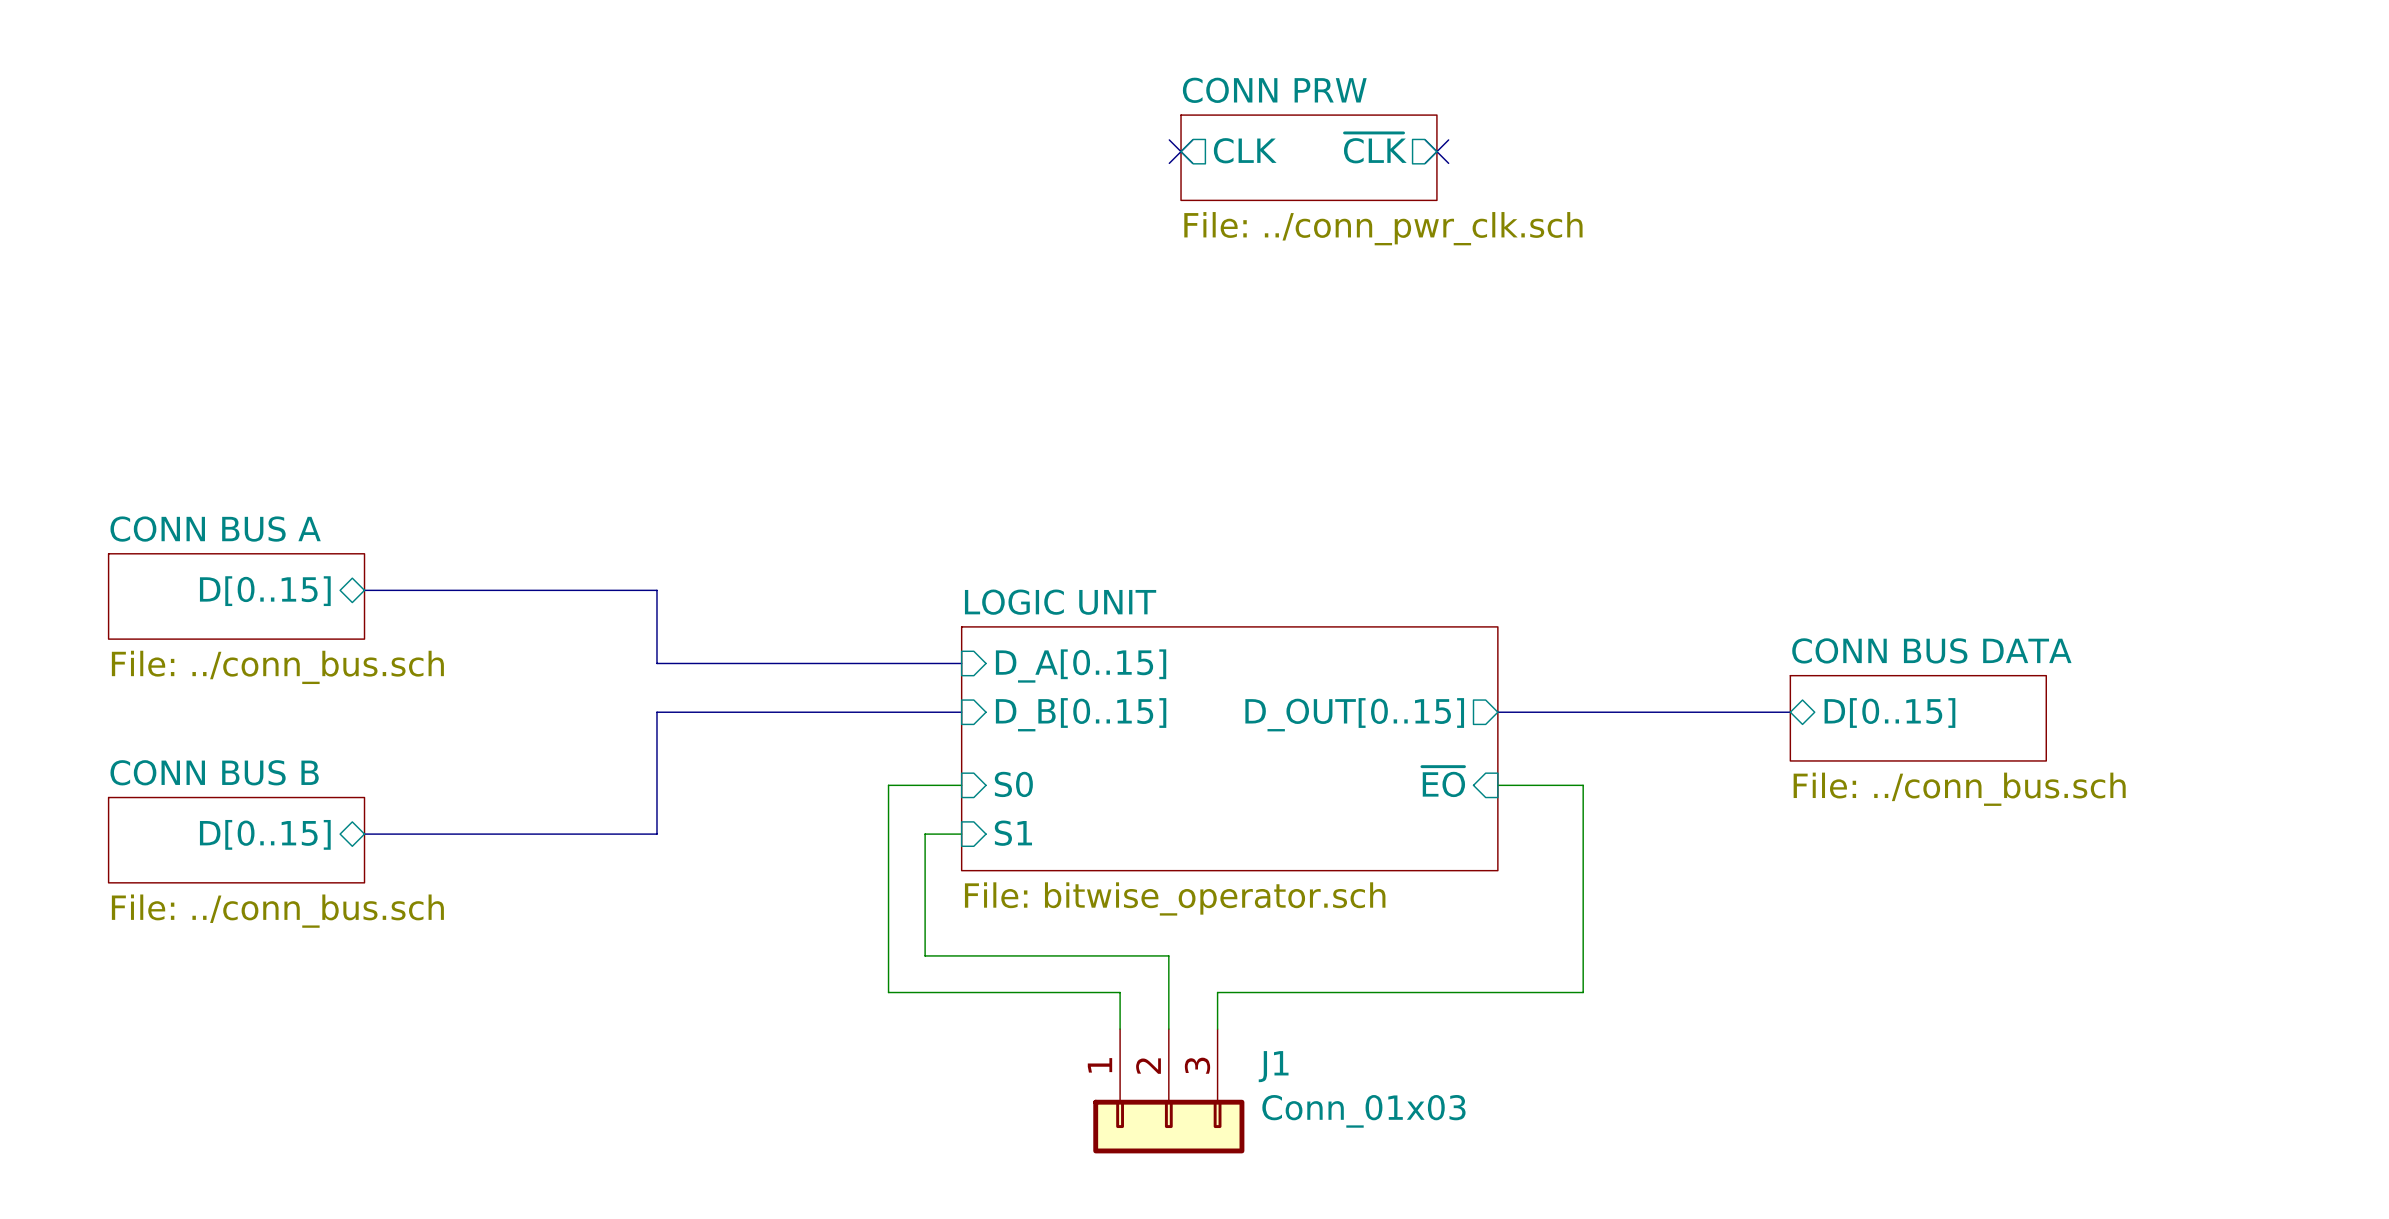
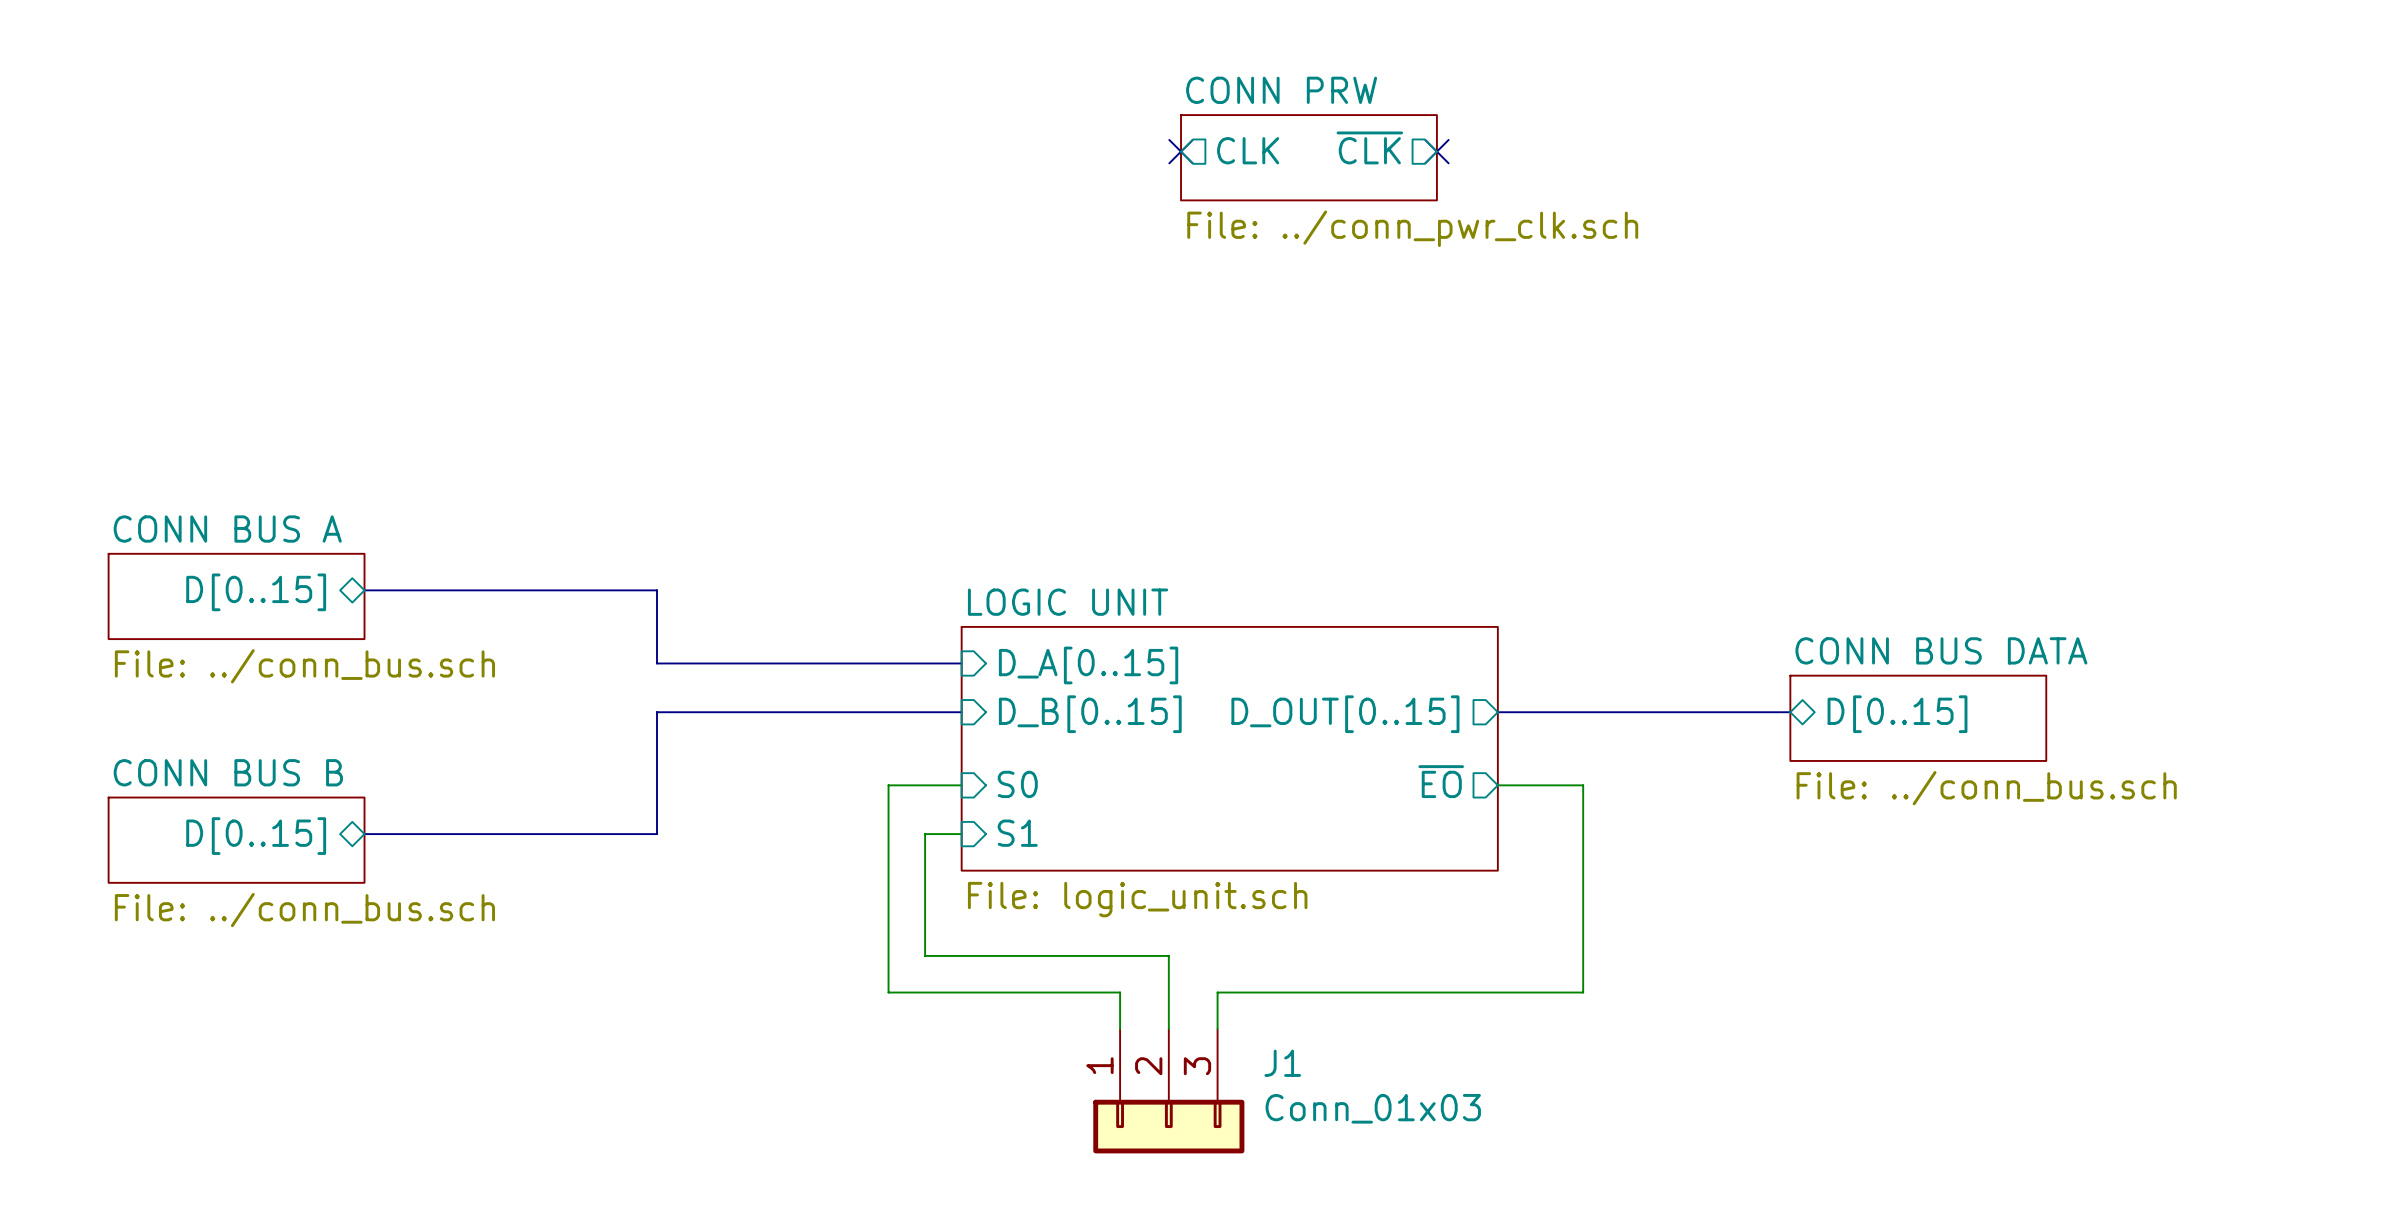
sheet pin shape: input (1443, 781) -> output (1441, 781)
sheet LOGIC UNIT value: File: bitwise_operator.sch (1175, 898) -> File: logic_unit.sch (1137, 899)

